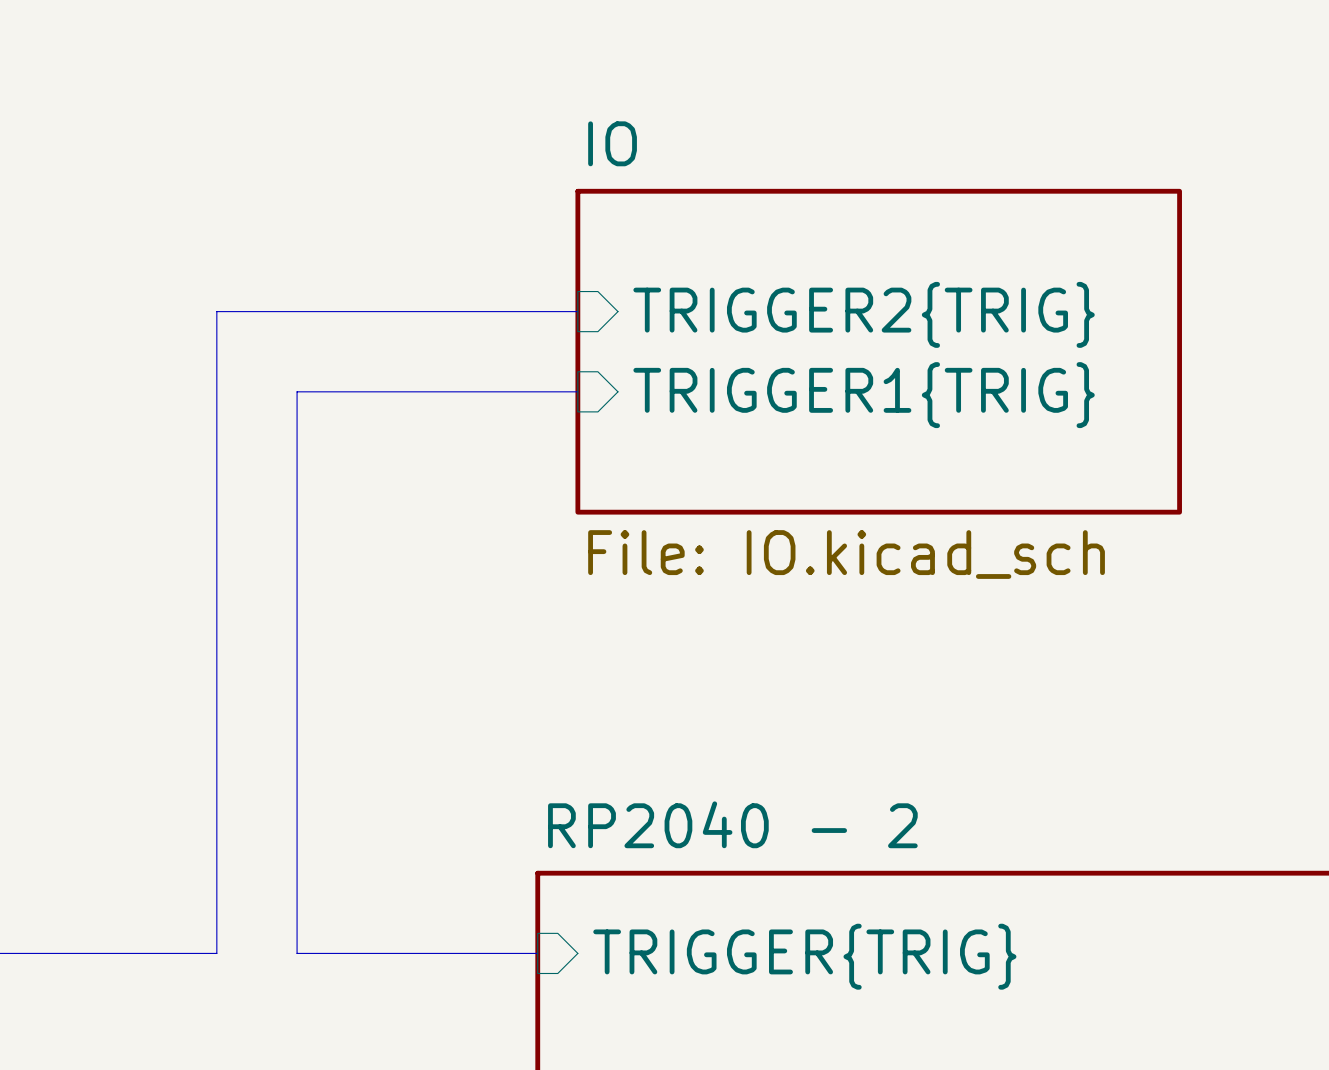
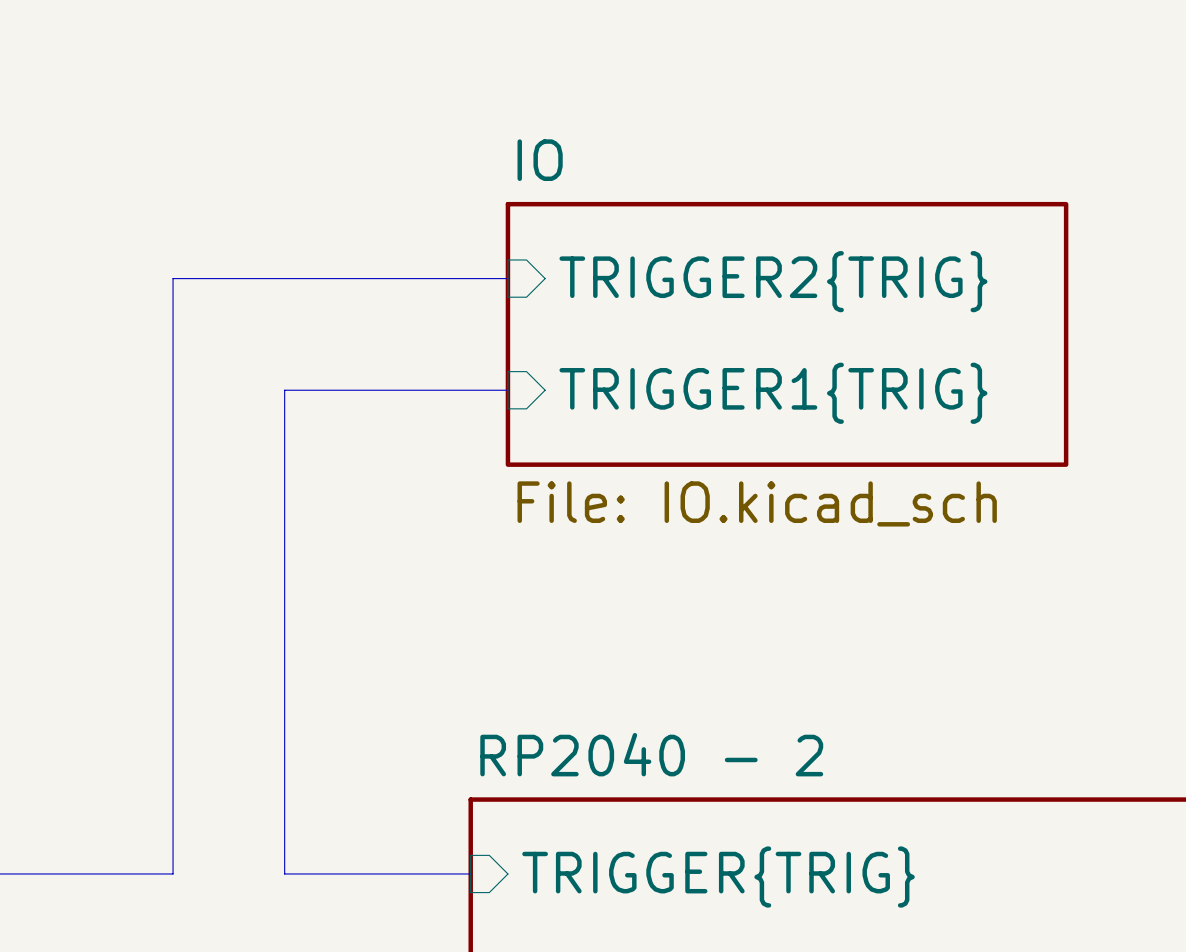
sheet IO shape: [575, 188, 1182, 515] -> [505, 201, 1069, 467]
bus: (577, 391) (297, 391) (297, 953) (337, 953) -> (507, 390) (284, 390) (284, 873)
sheet pin position: TRIGGER1{TRIG} (864, 395) -> TRIGGER1{TRIG} (773, 393)

